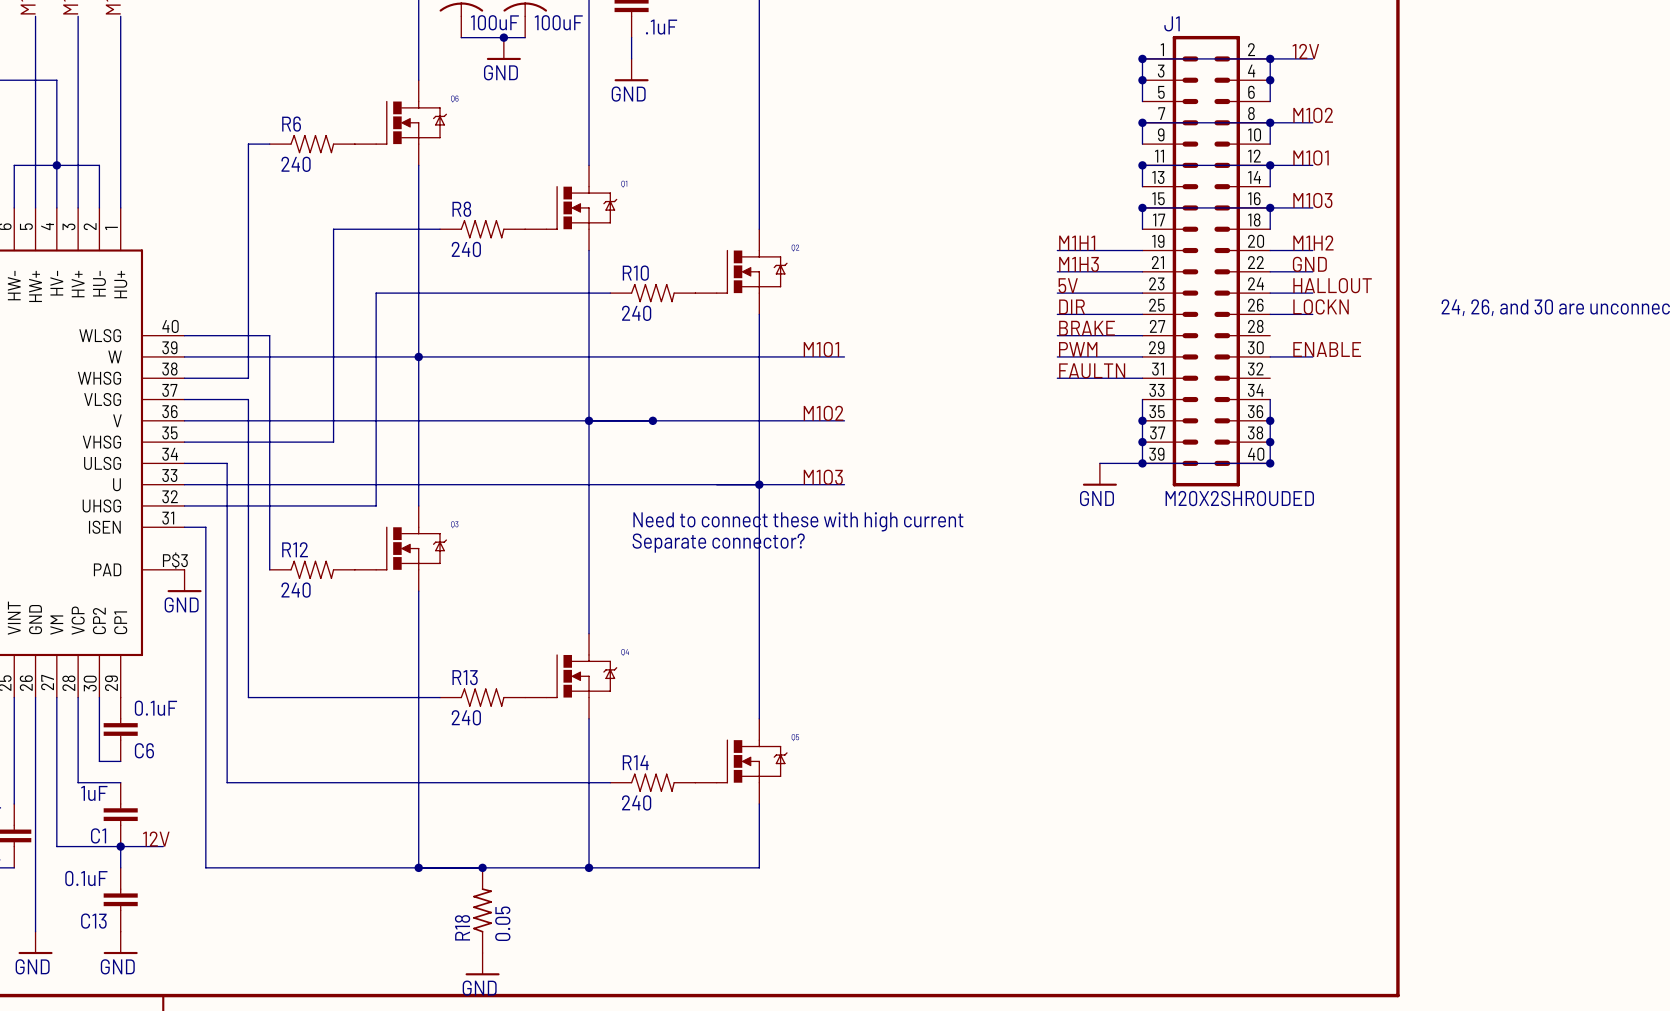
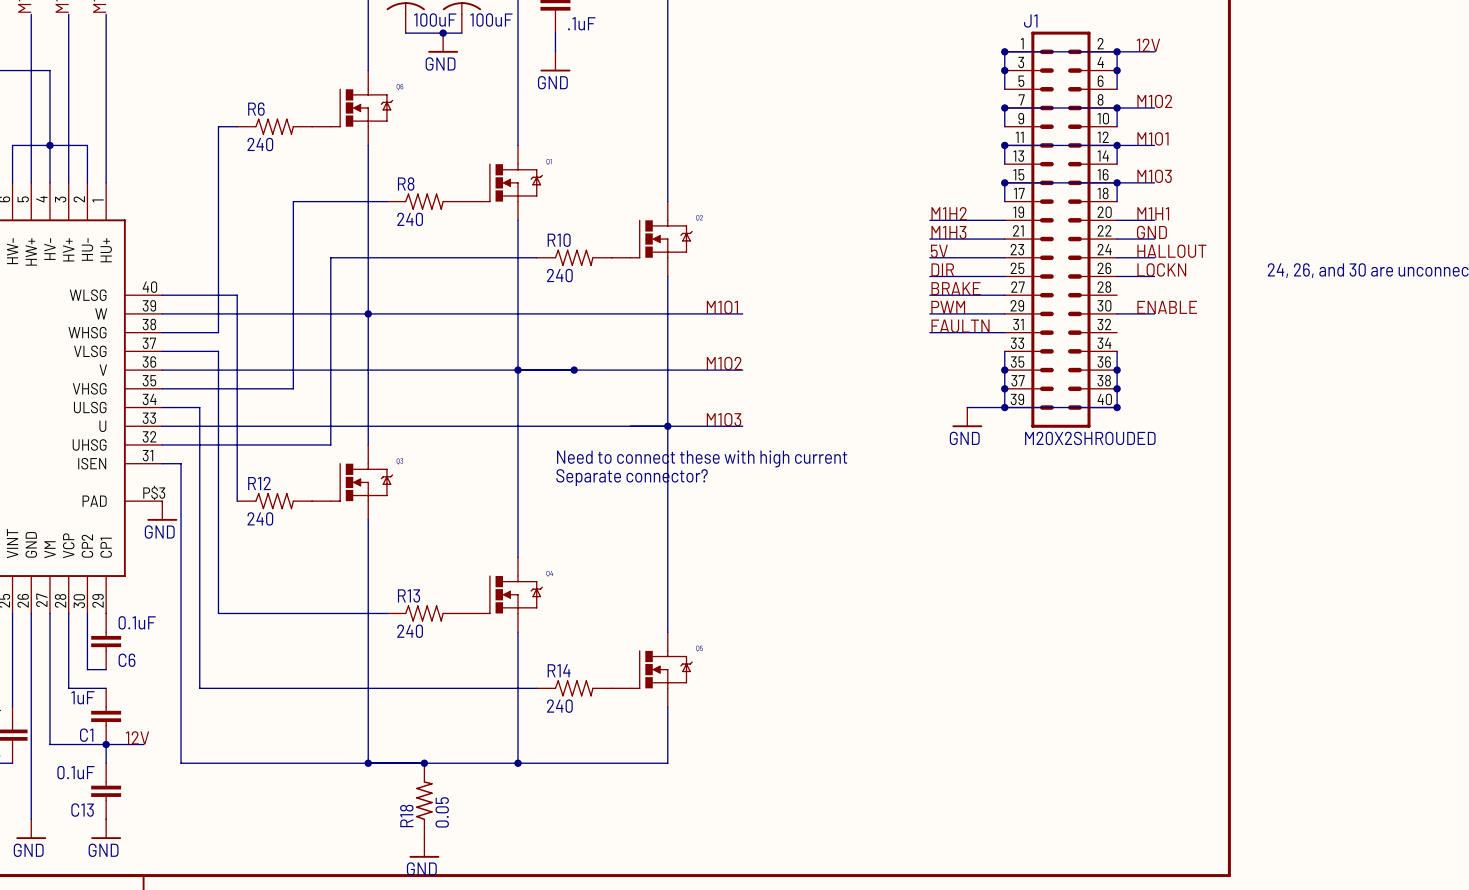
label: M1H2 (1313, 242) -> M1H1 (1153, 213)
label: M1H1 (1077, 243) -> M1H2 (949, 213)

